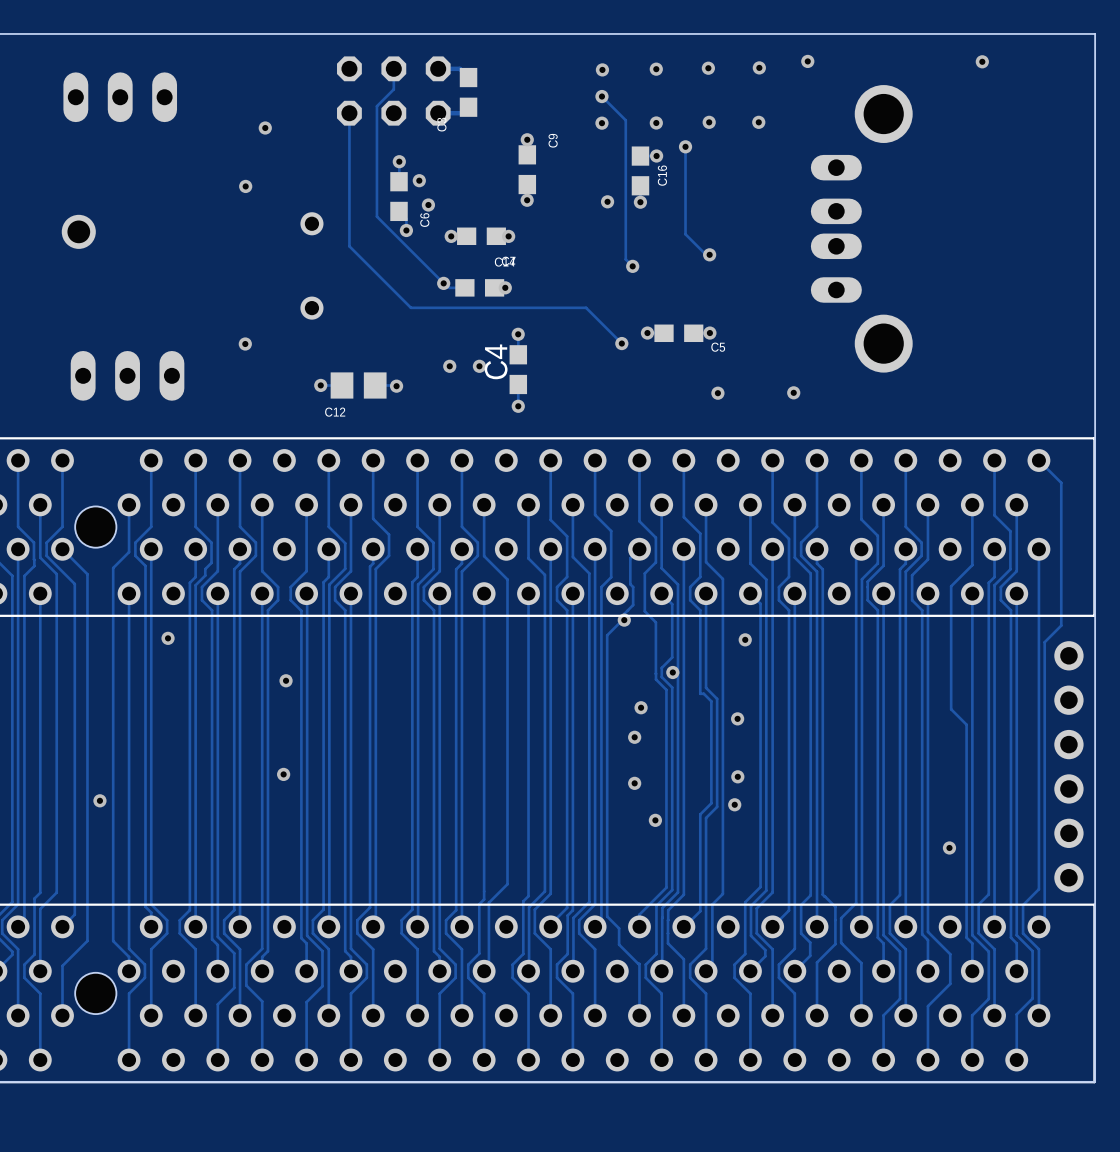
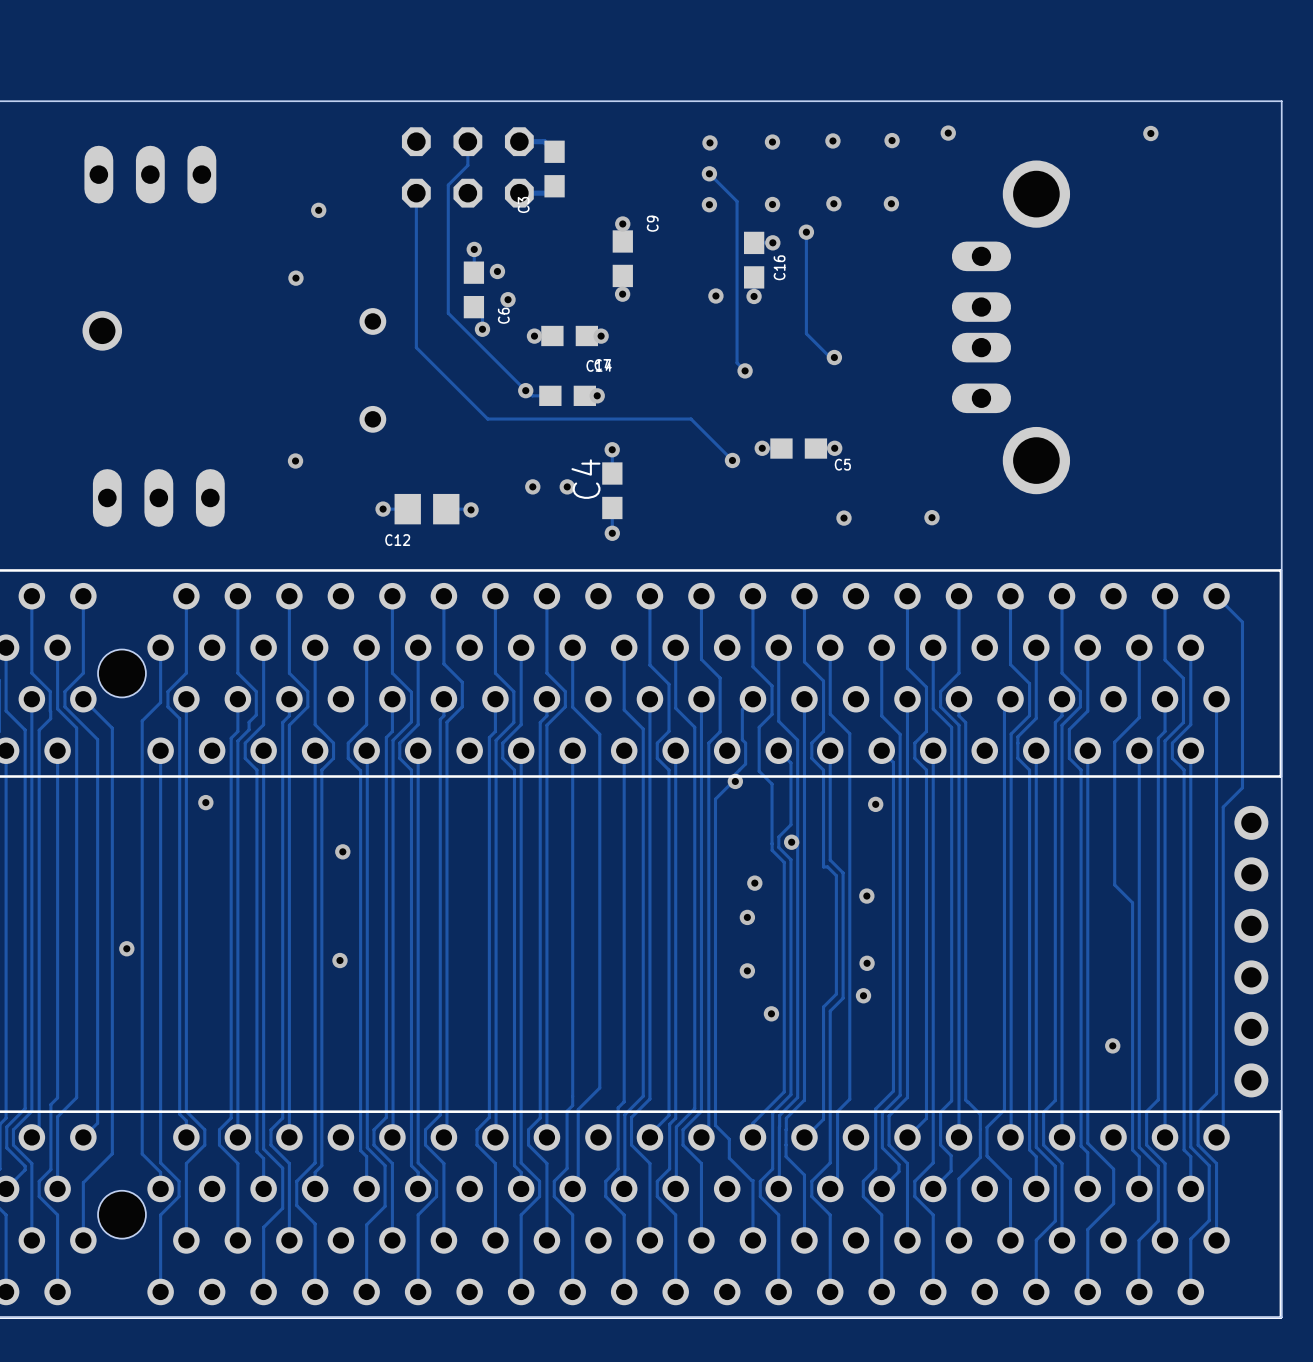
via position: (99, 800) -> (126, 948)

